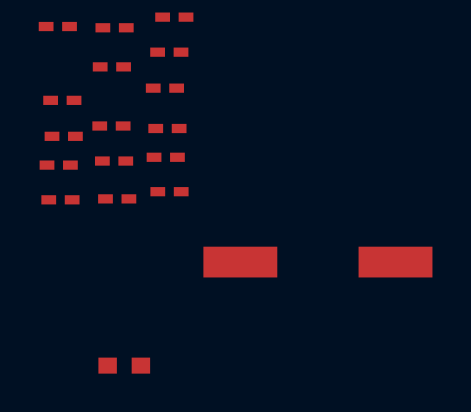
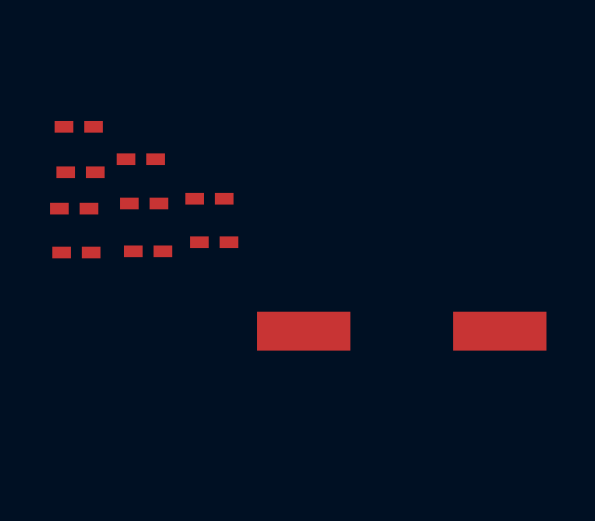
part: (174, 17) -> none
part: (57, 26) -> none
part: (114, 27) -> none
part: (169, 52) -> none
part: (111, 66) -> none
part: (164, 88) -> none
part: (167, 128) -> none
part: (124, 365) -> none

